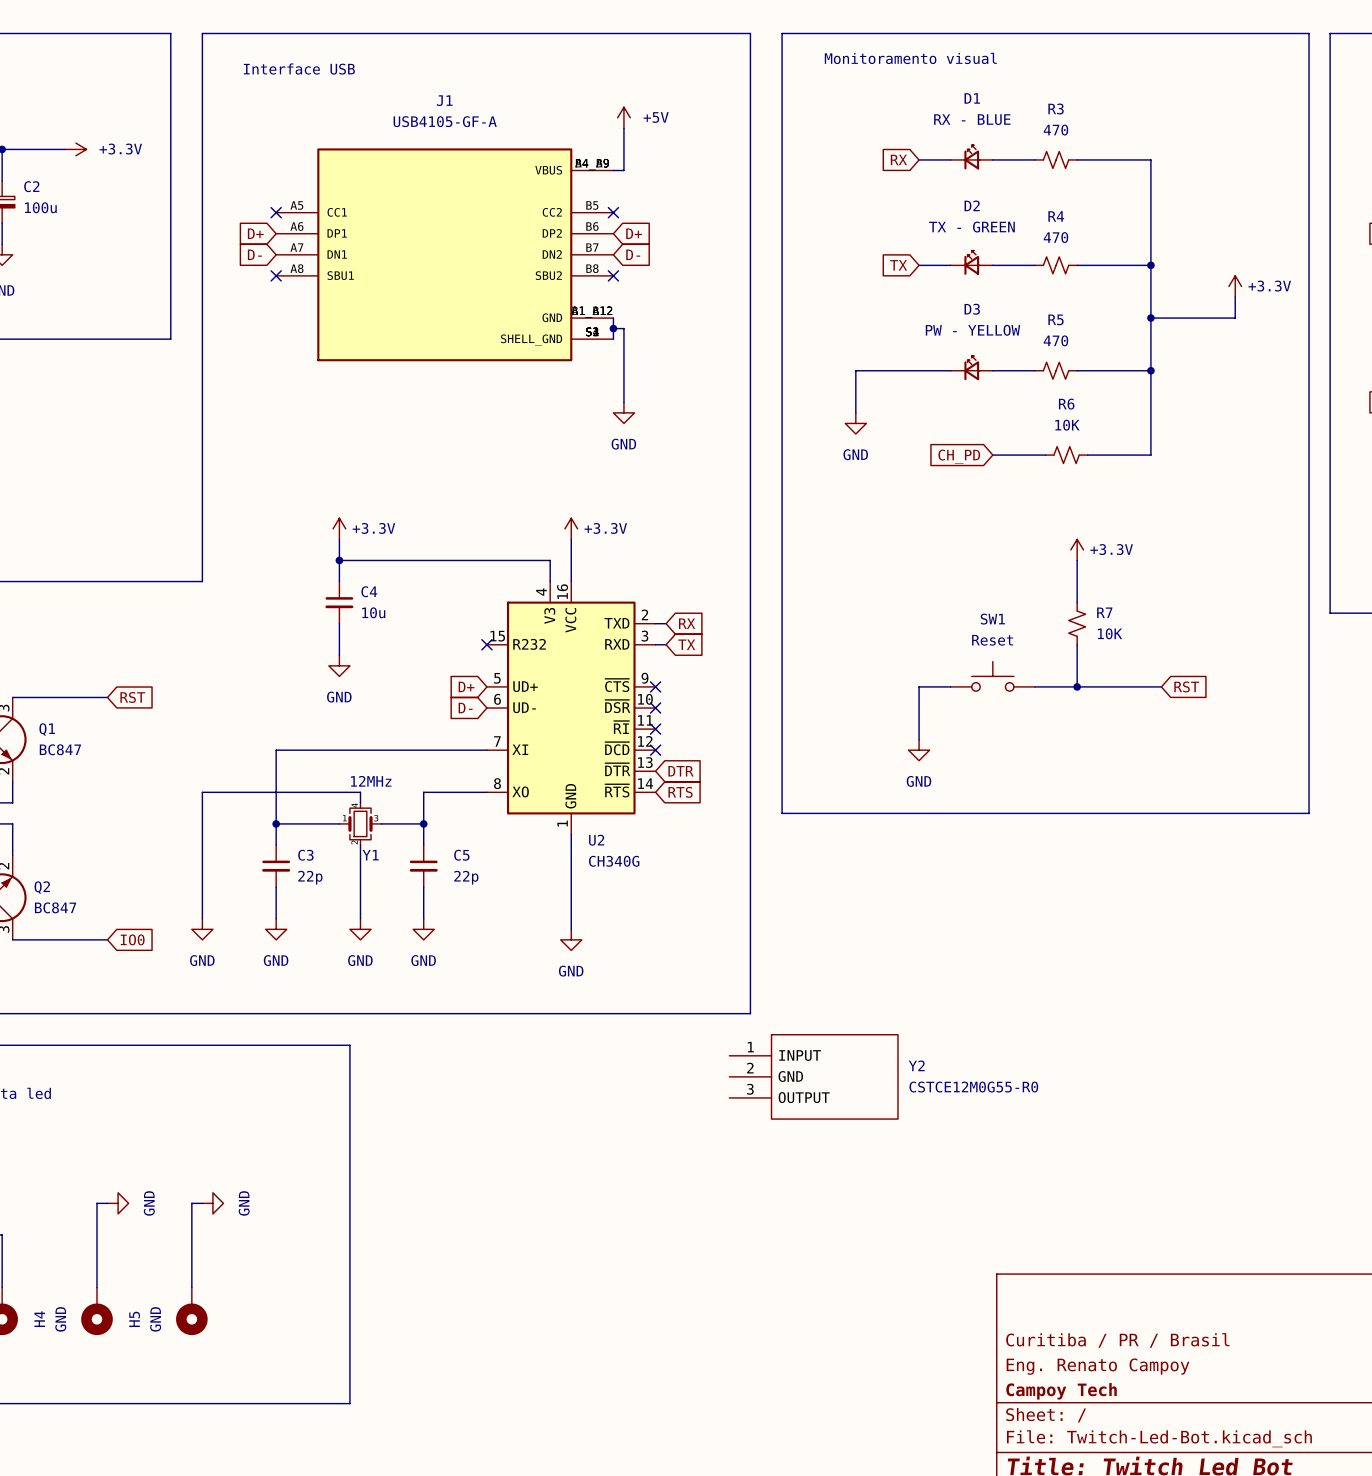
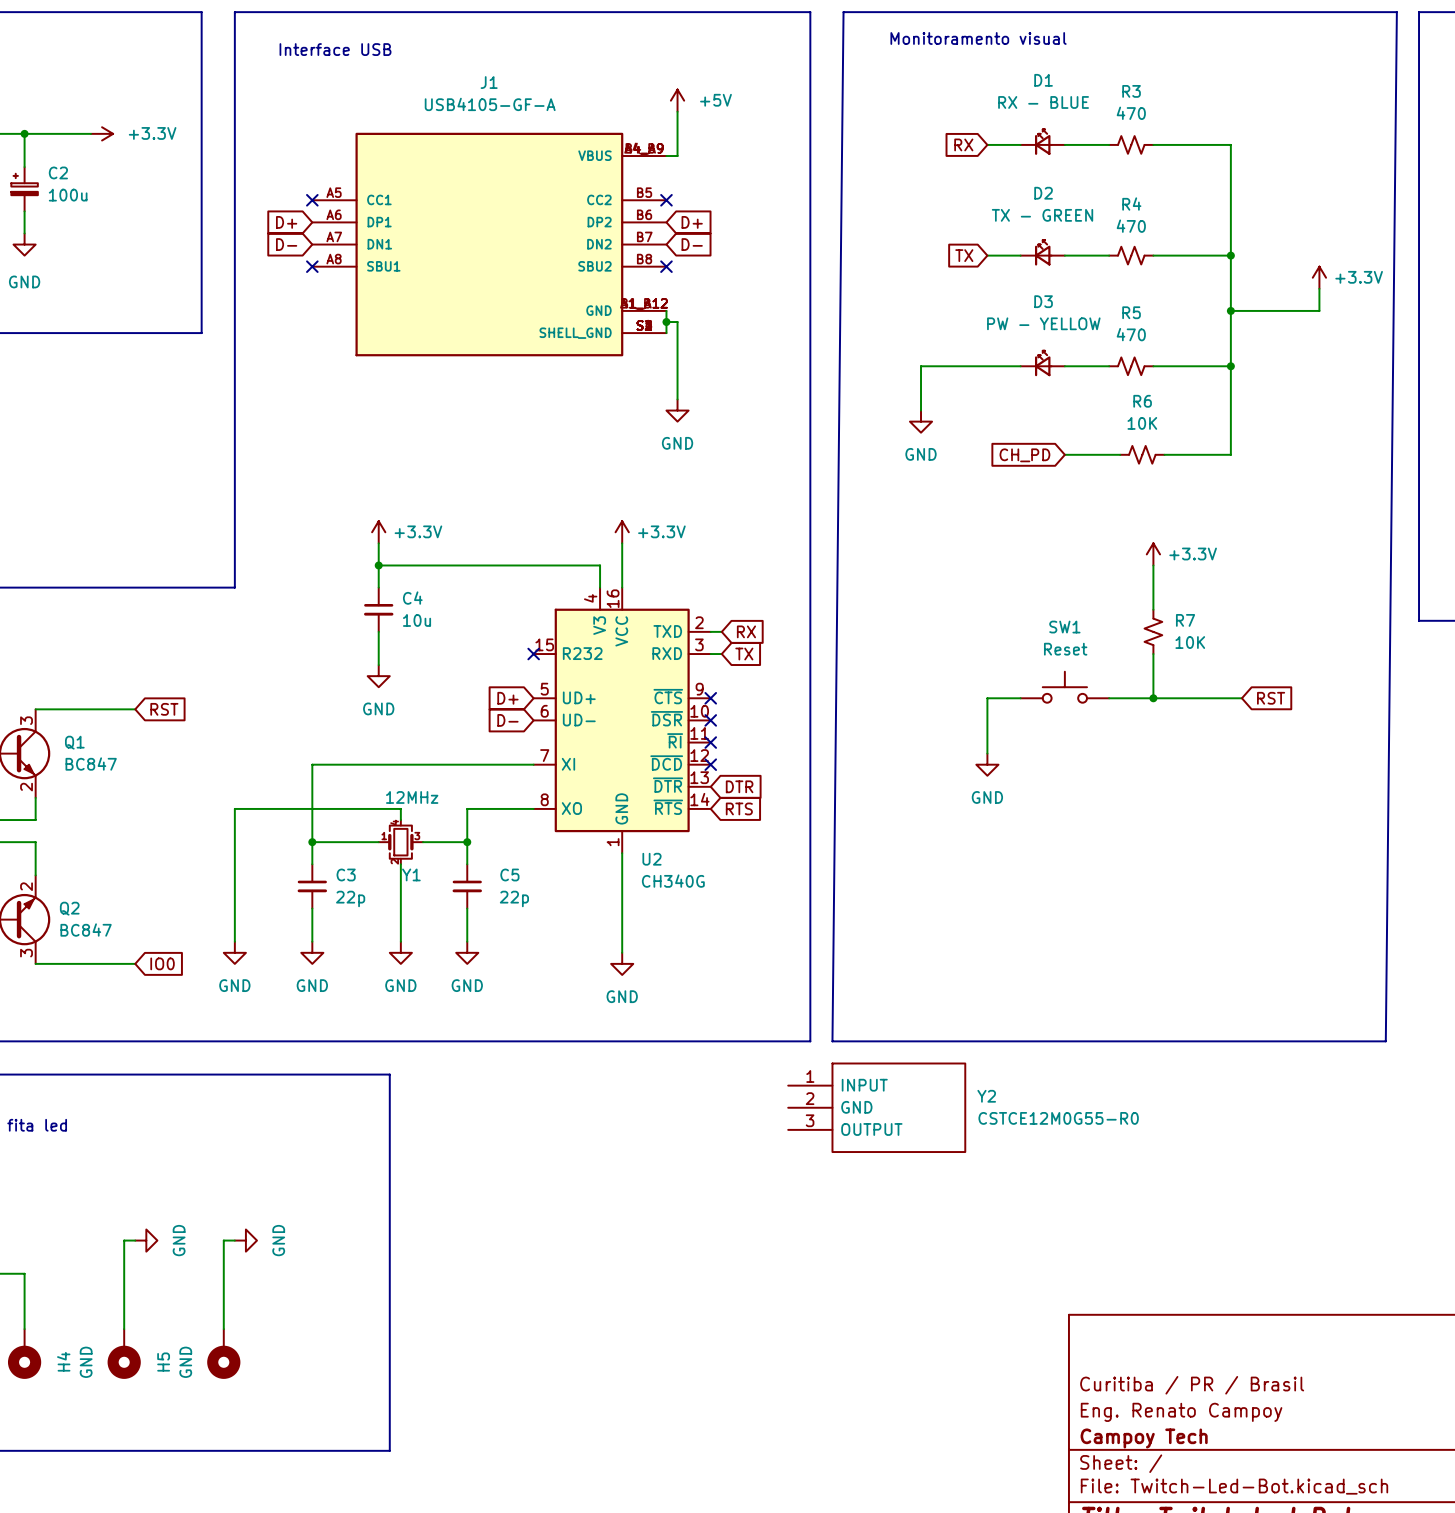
line: (782, 33) (782, 813) (1309, 813) (1309, 33) -> (843, 12) (832, 1041) (1385, 1041) (1396, 12)

